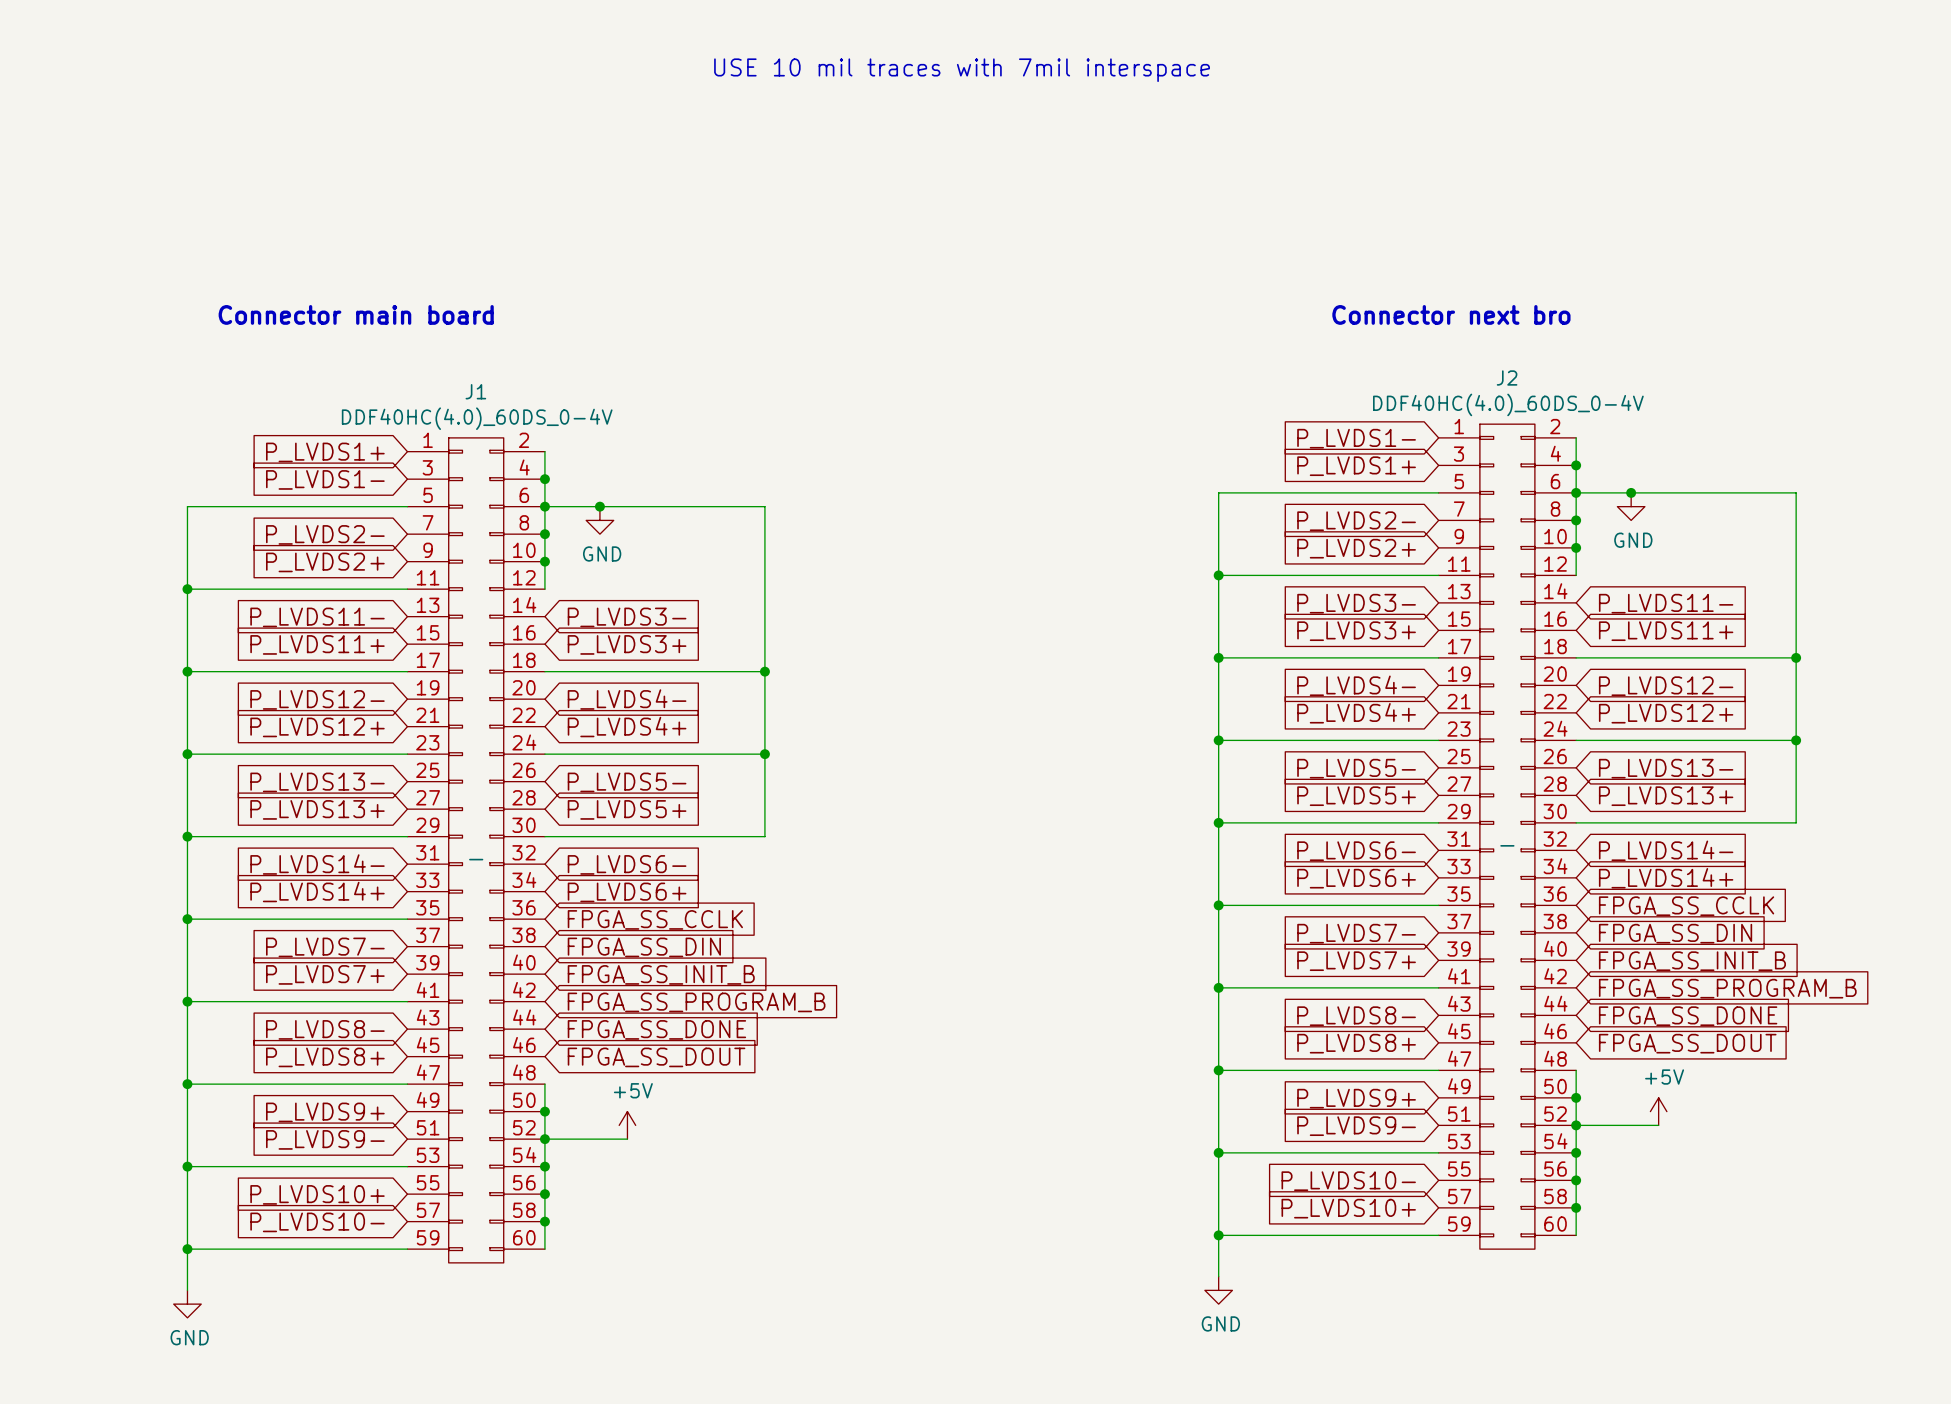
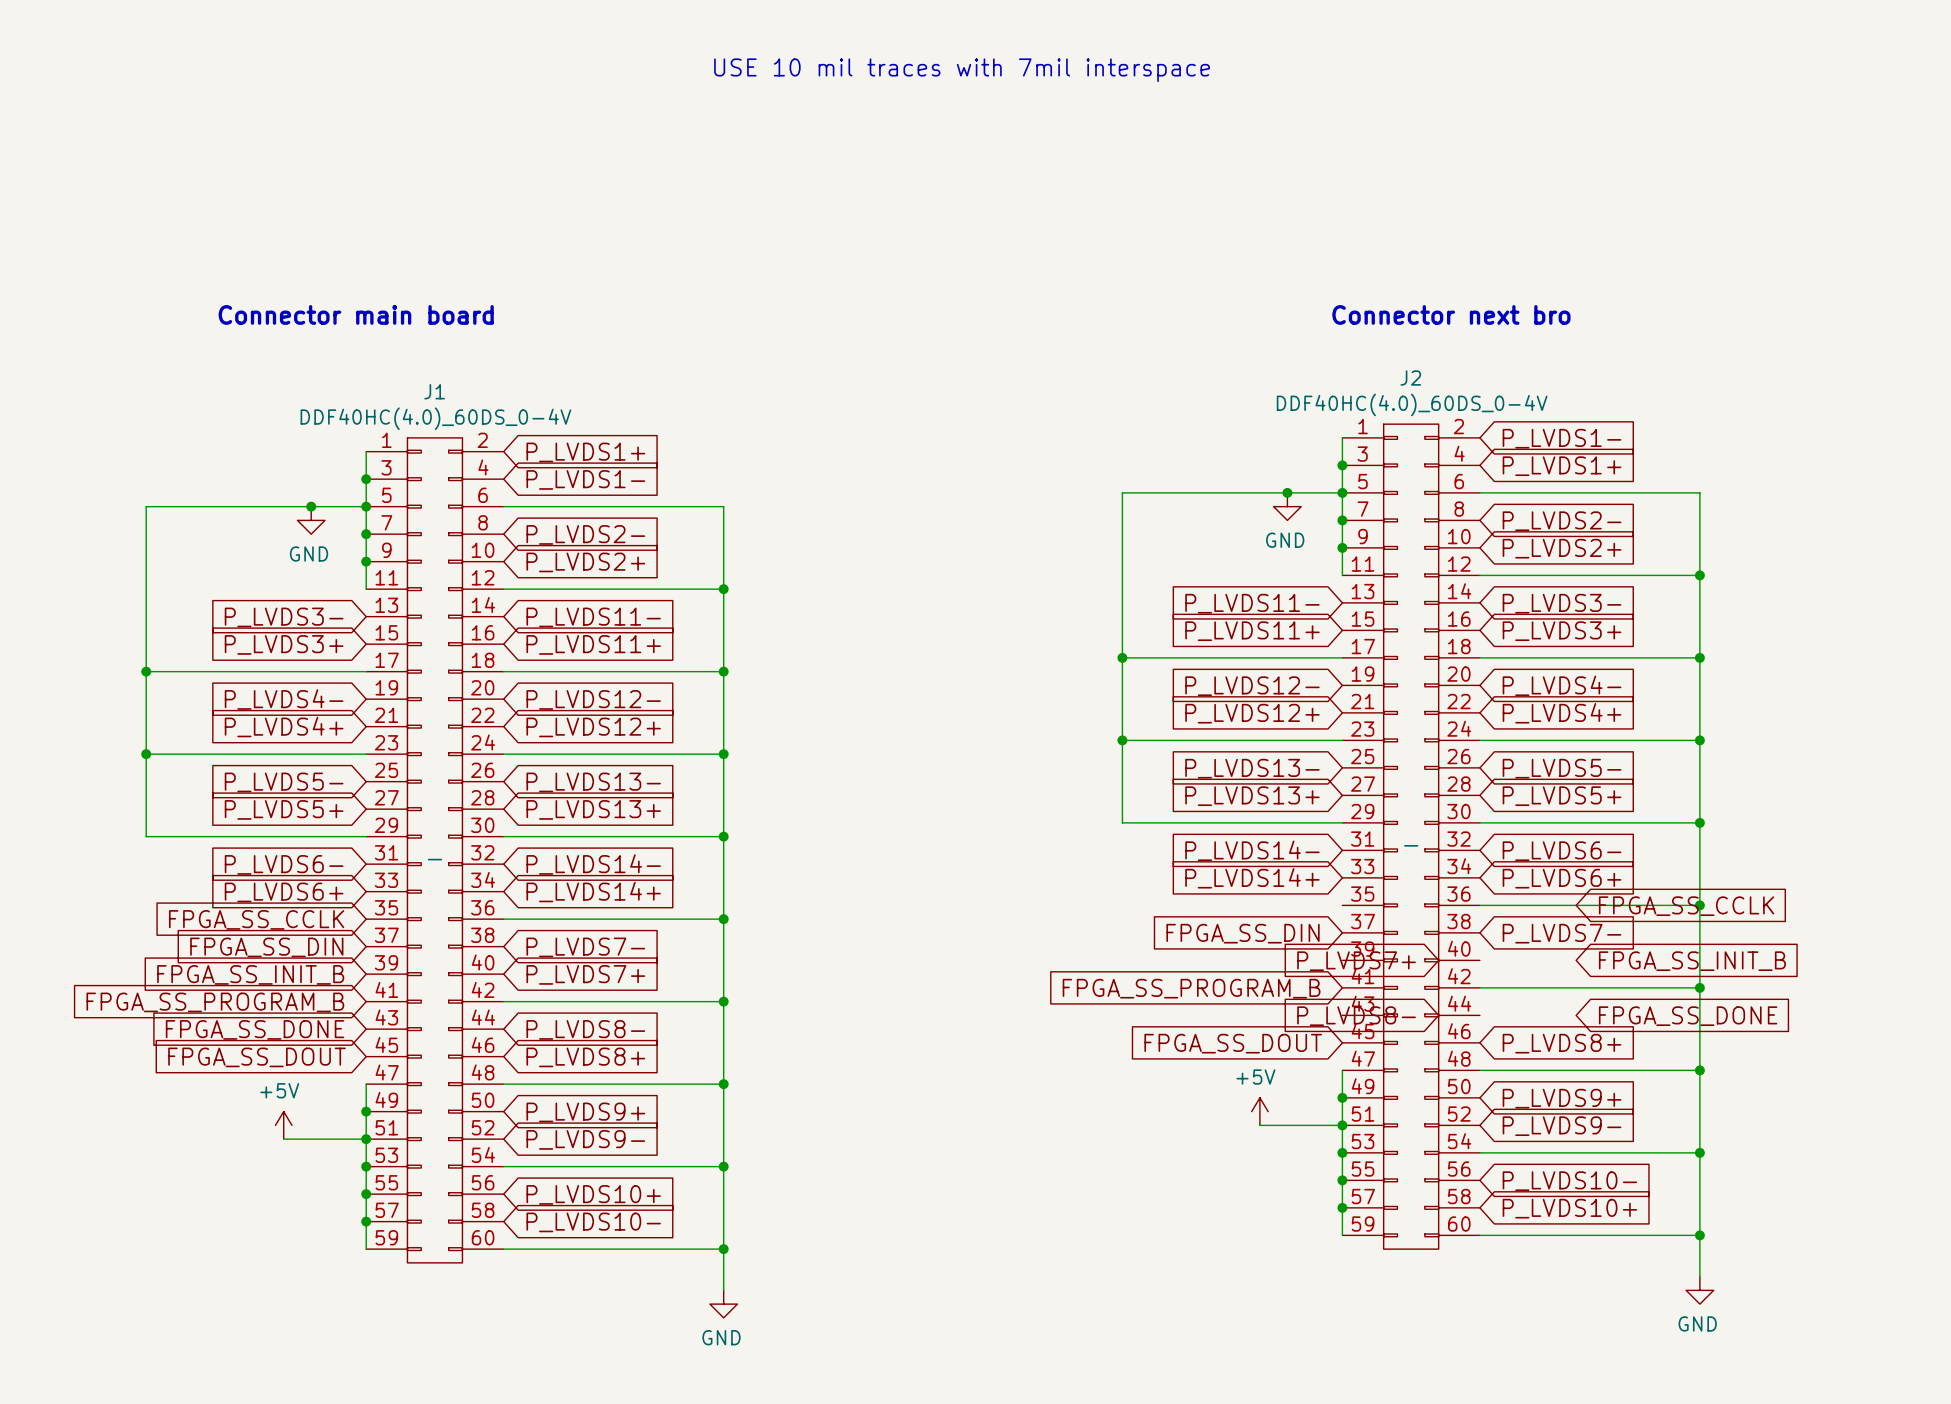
wire: (1576, 437) (1576, 575) -> (1342, 437) (1342, 575)
global label rotation: 0° (1356, 438) -> 180° (1562, 438)
global label position: P_LVDS1- (1356, 438) -> P_LVDS1- (1562, 438)
wire: (544, 451) (544, 589) -> (366, 451) (366, 589)
global label rotation: 0° (325, 452) -> 180° (585, 452)
global label position: P_LVDS1+ (325, 452) -> P_LVDS1+ (585, 452)
junction: none -> (1342, 465)
junction: (1576, 465) -> none
global label rotation: 0° (1356, 466) -> 180° (1562, 466)
global label position: P_LVDS1+ (1356, 466) -> P_LVDS1+ (1562, 466)
global label rotation: 0° (325, 479) -> 180° (585, 479)
global label position: P_LVDS1- (325, 479) -> P_LVDS1- (585, 479)
junction: none -> (366, 479)
junction: (544, 479) -> none
wire: (1218, 492) (1218, 1276) -> (1218, 492) (1122, 492) (1122, 822) (1218, 822)
junction: none -> (1287, 492)
wire: (1342, 492) (1438, 492) -> (1479, 492) (1576, 492)
junction: none -> (1342, 492)
junction: (1576, 492) -> none
junction: (1631, 492) -> none
wire: (1699, 492) (1796, 492) (1796, 822) (1699, 822) -> (1699, 492) (1699, 1276)
wire: (187, 506) (187, 1290) -> (187, 506) (146, 506) (146, 836) (187, 836)
junction: none -> (311, 506)
junction: none -> (366, 506)
junction: (544, 506) -> none
junction: (599, 506) -> none
wire: (723, 506) (764, 506) (764, 836) (723, 836) -> (723, 506) (723, 1290)
power symbol: none -> GND (1287, 506)
power symbol: GND (1631, 506) -> none
power symbol: none -> GND (311, 520)
power symbol: GND (599, 520) -> none
junction: none -> (1342, 520)
junction: (1576, 520) -> none
global label rotation: 0° (1356, 521) -> 180° (1562, 521)
global label position: P_LVDS2- (1356, 521) -> P_LVDS2- (1562, 521)
global label rotation: 0° (325, 534) -> 180° (585, 534)
global label position: P_LVDS2- (325, 534) -> P_LVDS2- (585, 534)
junction: none -> (366, 534)
junction: (544, 534) -> none
junction: none -> (1342, 547)
junction: (1576, 547) -> none
global label rotation: 0° (1356, 548) -> 180° (1562, 548)
global label position: P_LVDS2+ (1356, 548) -> P_LVDS2+ (1562, 548)
junction: none -> (366, 561)
junction: (544, 561) -> none
global label rotation: 0° (325, 562) -> 180° (585, 562)
global label position: P_LVDS2+ (325, 562) -> P_LVDS2+ (585, 562)
wire: (1218, 575) (1438, 575) -> (1479, 575) (1699, 575)
junction: (1218, 575) -> none
junction: none -> (1699, 575)
wire: (187, 589) (407, 589) -> none
junction: (187, 589) -> none
wire: none -> (503, 589) (723, 589)
junction: none -> (723, 589)
global label rotation: 0° (1356, 603) -> 180° (1562, 603)
global label position: P_LVDS3- (1356, 603) -> P_LVDS3- (1562, 603)
global label rotation: 0° (1666, 603) -> 180° (1252, 603)
global label position: P_LVDS11- (1666, 603) -> P_LVDS11- (1252, 603)
global label rotation: 0° (317, 617) -> 180° (593, 617)
global label position: P_LVDS11- (317, 617) -> P_LVDS11- (593, 617)
global label rotation: 0° (627, 617) -> 180° (284, 617)
global label position: P_LVDS3- (627, 617) -> P_LVDS3- (284, 617)
global label rotation: 0° (1356, 631) -> 180° (1562, 631)
global label position: P_LVDS3+ (1356, 631) -> P_LVDS3+ (1562, 631)
global label rotation: 0° (1666, 631) -> 180° (1252, 631)
global label position: P_LVDS11+ (1666, 631) -> P_LVDS11+ (1252, 631)
global label rotation: 0° (317, 644) -> 180° (593, 644)
global label position: P_LVDS11+ (317, 644) -> P_LVDS11+ (593, 644)
global label rotation: 0° (627, 644) -> 180° (284, 644)
global label position: P_LVDS3+ (627, 644) -> P_LVDS3+ (284, 644)
wire: none -> (1122, 657) (1218, 657)
junction: none -> (1122, 657)
junction: (1218, 657) -> none
wire: (1342, 657) (1438, 657) -> (1479, 657) (1576, 657)
wire: (1699, 657) (1796, 657) -> none
junction: none -> (1699, 657)
junction: (1796, 657) -> none
wire: none -> (146, 671) (187, 671)
junction position: (187, 671) -> (146, 671)
wire: (723, 671) (764, 671) -> none
junction position: (764, 671) -> (723, 671)
global label rotation: 0° (1356, 685) -> 180° (1562, 685)
global label position: P_LVDS4- (1356, 685) -> P_LVDS4- (1562, 685)
global label rotation: 0° (1666, 686) -> 180° (1252, 686)
global label position: P_LVDS12- (1666, 686) -> P_LVDS12- (1252, 686)
global label rotation: 0° (317, 699) -> 180° (593, 699)
global label position: P_LVDS12- (317, 699) -> P_LVDS12- (593, 699)
global label rotation: 0° (627, 699) -> 180° (284, 699)
global label position: P_LVDS4- (627, 699) -> P_LVDS4- (284, 699)
global label rotation: 0° (1356, 713) -> 180° (1562, 713)
global label position: P_LVDS4+ (1356, 713) -> P_LVDS4+ (1562, 713)
global label rotation: 0° (1666, 713) -> 180° (1252, 713)
global label position: P_LVDS12+ (1666, 713) -> P_LVDS12+ (1252, 713)
global label rotation: 0° (317, 727) -> 180° (593, 727)
global label position: P_LVDS12+ (317, 727) -> P_LVDS12+ (593, 727)
global label rotation: 0° (627, 727) -> 180° (284, 727)
global label position: P_LVDS4+ (627, 727) -> P_LVDS4+ (284, 727)
wire: none -> (1122, 740) (1218, 740)
junction: none -> (1122, 740)
junction: (1218, 740) -> none
wire: (1342, 740) (1438, 740) -> (1479, 740) (1576, 740)
wire: (1699, 740) (1796, 740) -> none
junction: none -> (1699, 740)
junction: (1796, 740) -> none
wire: none -> (146, 754) (187, 754)
junction position: (187, 754) -> (146, 754)
wire: (723, 754) (764, 754) -> none
junction position: (764, 754) -> (723, 754)
global label rotation: 0° (1356, 768) -> 180° (1562, 768)
global label position: P_LVDS5- (1356, 768) -> P_LVDS5- (1562, 768)
global label rotation: 0° (1666, 768) -> 180° (1252, 768)
global label position: P_LVDS13- (1666, 768) -> P_LVDS13- (1252, 768)
global label rotation: 0° (317, 782) -> 180° (593, 782)
global label position: P_LVDS13- (317, 782) -> P_LVDS13- (593, 782)
global label rotation: 0° (627, 782) -> 180° (284, 782)
global label position: P_LVDS5- (627, 782) -> P_LVDS5- (284, 782)
global label rotation: 0° (1356, 796) -> 180° (1562, 796)
global label position: P_LVDS5+ (1356, 796) -> P_LVDS5+ (1562, 796)
global label rotation: 0° (1666, 796) -> 180° (1252, 796)
global label position: P_LVDS13+ (1666, 796) -> P_LVDS13+ (1252, 796)
global label rotation: 0° (317, 809) -> 180° (593, 809)
global label position: P_LVDS13+ (317, 809) -> P_LVDS13+ (593, 809)
global label rotation: 0° (627, 809) -> 180° (284, 809)
global label position: P_LVDS5+ (627, 809) -> P_LVDS5+ (284, 809)
junction: (1218, 822) -> none
wire: (1342, 822) (1438, 822) -> (1479, 822) (1576, 822)
junction: none -> (1699, 822)
junction: (187, 836) -> none
junction: none -> (723, 836)
J2 position: (1507, 836) -> (1411, 836)
J1 position: (476, 850) -> (434, 850)
global label rotation: 0° (1666, 850) -> 180° (1252, 850)
global label position: P_LVDS14- (1666, 850) -> P_LVDS14- (1252, 850)
global label rotation: 0° (1356, 851) -> 180° (1562, 851)
global label position: P_LVDS6- (1356, 851) -> P_LVDS6- (1562, 851)
global label rotation: 0° (317, 864) -> 180° (593, 864)
global label position: P_LVDS14- (317, 864) -> P_LVDS14- (593, 864)
global label rotation: 0° (627, 864) -> 180° (284, 864)
global label position: P_LVDS6- (627, 864) -> P_LVDS6- (284, 864)
global label rotation: 0° (1356, 878) -> 180° (1562, 878)
global label position: P_LVDS6+ (1356, 878) -> P_LVDS6+ (1562, 878)
global label rotation: 0° (1666, 878) -> 180° (1252, 878)
global label position: P_LVDS14+ (1666, 878) -> P_LVDS14+ (1252, 878)
global label rotation: 0° (317, 892) -> 180° (593, 892)
global label position: P_LVDS14+ (317, 892) -> P_LVDS14+ (593, 892)
global label rotation: 0° (627, 892) -> 180° (284, 892)
global label position: P_LVDS6+ (627, 892) -> P_LVDS6+ (284, 892)
wire: (1218, 905) (1438, 905) -> (1479, 905) (1699, 905)
junction: (1218, 905) -> none
junction: none -> (1699, 905)
wire: (187, 919) (407, 919) -> none
junction: (187, 919) -> none
wire: none -> (503, 919) (723, 919)
global label rotation: 0° (655, 919) -> 180° (256, 919)
global label position: FPGA_SS_CCLK (655, 919) -> FPGA_SS_CCLK (256, 919)
junction: none -> (723, 919)
global label rotation: 0° (1356, 933) -> 180° (1562, 933)
global label position: P_LVDS7- (1356, 933) -> P_LVDS7- (1562, 933)
global label rotation: 0° (1675, 933) -> 180° (1243, 933)
global label position: FPGA_SS_DIN (1675, 933) -> FPGA_SS_DIN (1243, 933)
global label rotation: 0° (325, 947) -> 180° (585, 947)
global label position: P_LVDS7- (325, 947) -> P_LVDS7- (585, 947)
global label rotation: 0° (644, 947) -> 180° (266, 947)
global label position: FPGA_SS_DIN (644, 947) -> FPGA_SS_DIN (266, 947)
global label rotation: 0° (325, 974) -> 180° (585, 974)
global label position: P_LVDS7+ (325, 974) -> P_LVDS7+ (585, 974)
global label rotation: 0° (661, 974) -> 180° (250, 974)
global label position: FPGA_SS_INIT_B (661, 974) -> FPGA_SS_INIT_B (250, 974)
wire: (1218, 987) (1438, 987) -> (1479, 987) (1699, 987)
junction: (1218, 987) -> none
junction: none -> (1699, 987)
global label rotation: 0° (1727, 988) -> 180° (1191, 988)
global label position: FPGA_SS_PROGRAM_B (1727, 988) -> FPGA_SS_PROGRAM_B (1191, 988)
wire: (187, 1001) (407, 1001) -> none
junction: (187, 1001) -> none
wire: none -> (503, 1001) (723, 1001)
junction: none -> (723, 1001)
global label rotation: 0° (696, 1002) -> 180° (215, 1002)
global label position: FPGA_SS_PROGRAM_B (696, 1002) -> FPGA_SS_PROGRAM_B (215, 1002)
global label rotation: 0° (325, 1029) -> 180° (585, 1029)
global label position: P_LVDS8- (325, 1029) -> P_LVDS8- (585, 1029)
global label rotation: 0° (656, 1029) -> 180° (255, 1029)
global label position: FPGA_SS_DONE (656, 1029) -> FPGA_SS_DONE (255, 1029)
global label rotation: 0° (1356, 1043) -> 180° (1562, 1043)
global label position: P_LVDS8+ (1356, 1043) -> P_LVDS8+ (1562, 1043)
global label rotation: 0° (1687, 1043) -> 180° (1233, 1043)
global label position: FPGA_SS_DOUT (1687, 1043) -> FPGA_SS_DOUT (1233, 1043)
global label rotation: 0° (325, 1057) -> 180° (585, 1057)
global label position: P_LVDS8+ (325, 1057) -> P_LVDS8+ (585, 1057)
global label rotation: 0° (656, 1057) -> 180° (256, 1057)
global label position: FPGA_SS_DOUT (656, 1057) -> FPGA_SS_DOUT (256, 1057)
wire: (1218, 1070) (1438, 1070) -> (1479, 1070) (1699, 1070)
junction: (1218, 1070) -> none
wire: (1576, 1070) (1576, 1235) -> (1342, 1070) (1342, 1235)
junction: none -> (1699, 1070)
wire: (187, 1084) (407, 1084) -> none
junction: (187, 1084) -> none
wire: none -> (503, 1084) (723, 1084)
wire: (544, 1084) (544, 1249) -> (366, 1084) (366, 1249)
junction: none -> (723, 1084)
junction: none -> (1342, 1097)
junction: (1576, 1097) -> none
global label rotation: 0° (1356, 1098) -> 180° (1562, 1098)
global label position: P_LVDS9+ (1356, 1098) -> P_LVDS9+ (1562, 1098)
junction: none -> (366, 1111)
junction: (544, 1111) -> none
power symbol: none -> +5V (1259, 1111)
power symbol: +5V (1658, 1111) -> none
global label rotation: 0° (325, 1112) -> 180° (585, 1112)
global label position: P_LVDS9+ (325, 1112) -> P_LVDS9+ (585, 1112)
power symbol: none -> +5V (283, 1125)
power symbol: +5V (627, 1125) -> none
wire: none -> (1259, 1125) (1342, 1125)
junction: none -> (1342, 1125)
wire: (1576, 1125) (1658, 1125) -> none
junction: (1576, 1125) -> none
global label rotation: 0° (1356, 1126) -> 180° (1562, 1126)
global label position: P_LVDS9- (1356, 1126) -> P_LVDS9- (1562, 1126)
global label rotation: 0° (325, 1139) -> 180° (585, 1139)
global label position: P_LVDS9- (325, 1139) -> P_LVDS9- (585, 1139)
junction: none -> (366, 1139)
wire: (544, 1139) (627, 1139) -> (283, 1139) (366, 1139)
junction: (544, 1139) -> none
wire: (1218, 1152) (1438, 1152) -> (1479, 1152) (1699, 1152)
junction: (1218, 1152) -> none
junction: none -> (1342, 1152)
junction: (1576, 1152) -> none
junction: none -> (1699, 1152)
wire: (187, 1166) (407, 1166) -> none
junction: (187, 1166) -> none
junction: none -> (366, 1166)
wire: none -> (503, 1166) (723, 1166)
junction: (544, 1166) -> none
junction: none -> (723, 1166)
junction: none -> (1342, 1180)
junction: (1576, 1180) -> none
global label rotation: 0° (1348, 1181) -> 180° (1569, 1181)
global label position: P_LVDS10- (1348, 1181) -> P_LVDS10- (1569, 1181)
global label rotation: 0° (317, 1194) -> 180° (593, 1194)
global label position: P_LVDS10+ (317, 1194) -> P_LVDS10+ (593, 1194)
junction: none -> (366, 1194)
junction: (544, 1194) -> none
junction: none -> (1342, 1207)
junction: (1576, 1207) -> none
global label rotation: 0° (1348, 1208) -> 180° (1569, 1208)
global label position: P_LVDS10+ (1348, 1208) -> P_LVDS10+ (1569, 1208)
junction: none -> (366, 1221)
junction: (544, 1221) -> none
global label rotation: 0° (317, 1222) -> 180° (593, 1222)
global label position: P_LVDS10- (317, 1222) -> P_LVDS10- (593, 1222)
wire: (1218, 1235) (1438, 1235) -> (1479, 1235) (1699, 1235)
junction: (1218, 1235) -> none
junction: none -> (1699, 1235)
wire: (187, 1249) (407, 1249) -> none
junction: (187, 1249) -> none
wire: none -> (503, 1249) (723, 1249)
junction: none -> (723, 1249)
power symbol: GND (1218, 1290) -> none
power symbol: none -> GND (1699, 1290)
power symbol: GND (187, 1304) -> none
power symbol: none -> GND (723, 1304)

